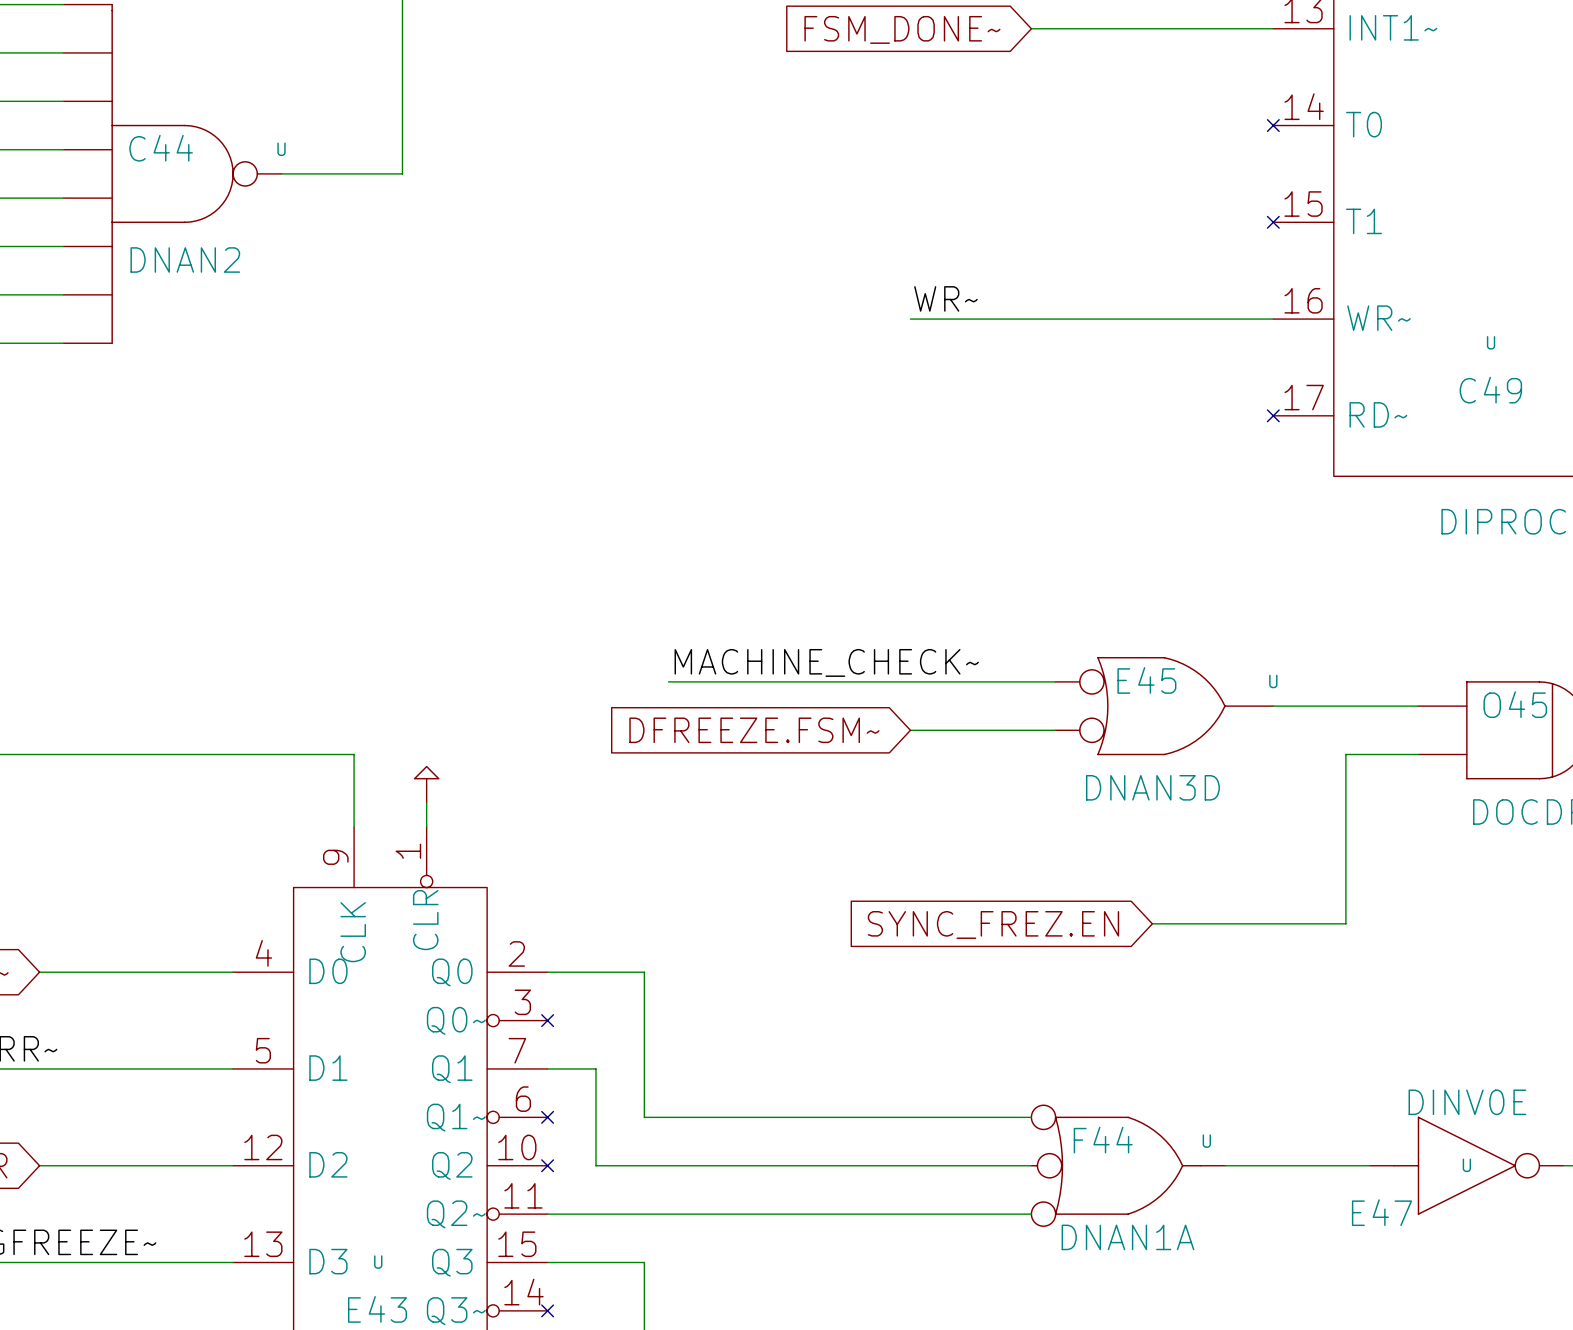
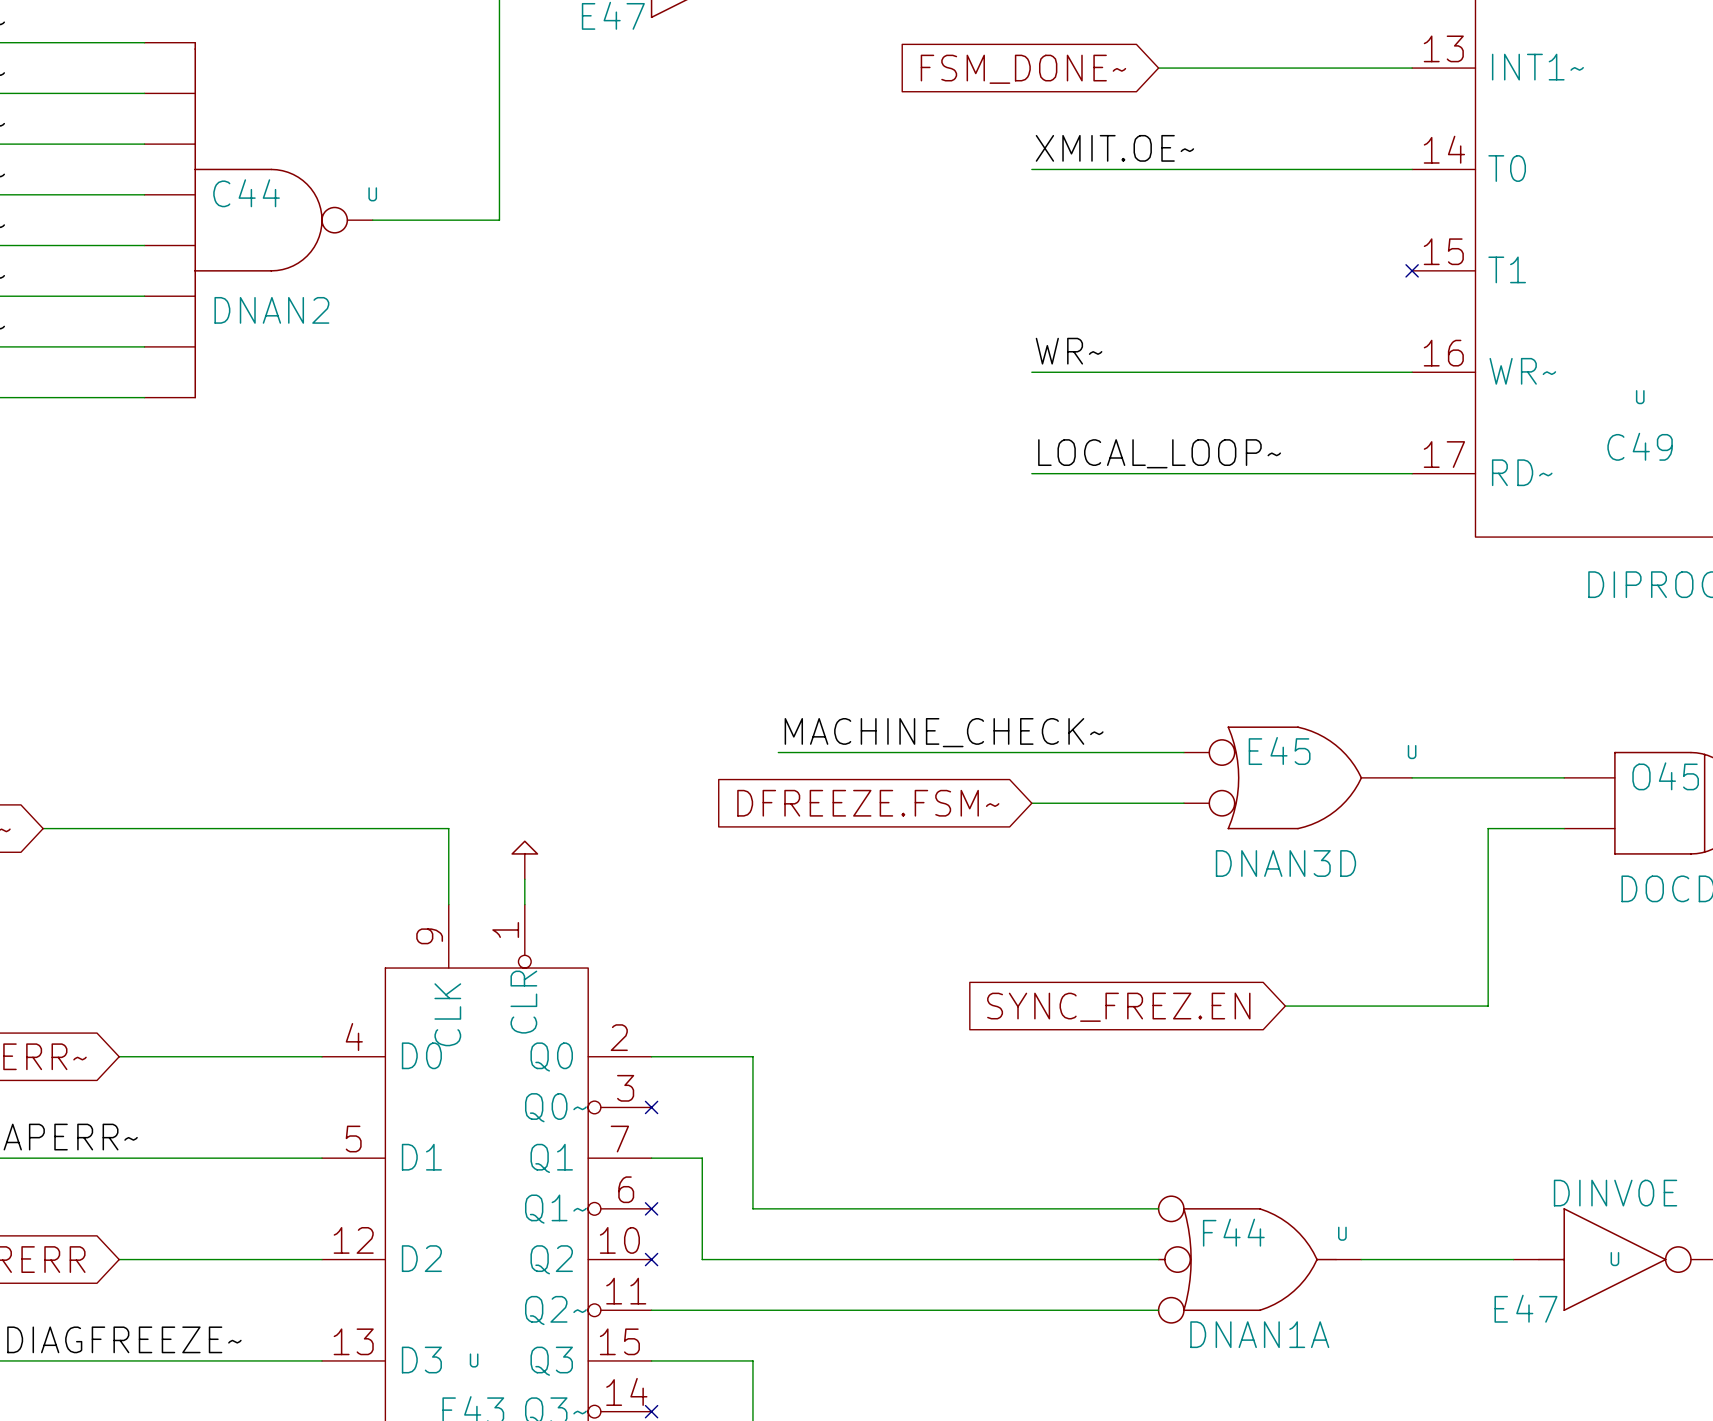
label: none -> XMIT.OE~ (1114, 148)
wire: none -> (1031, 169) (1412, 169)
no-connect mark: (1273, 125) -> none
label: none -> LOCAL_LOOP~ (1159, 453)
wire: none -> (1031, 473) (1412, 473)
no-connect mark: (1273, 415) -> none

